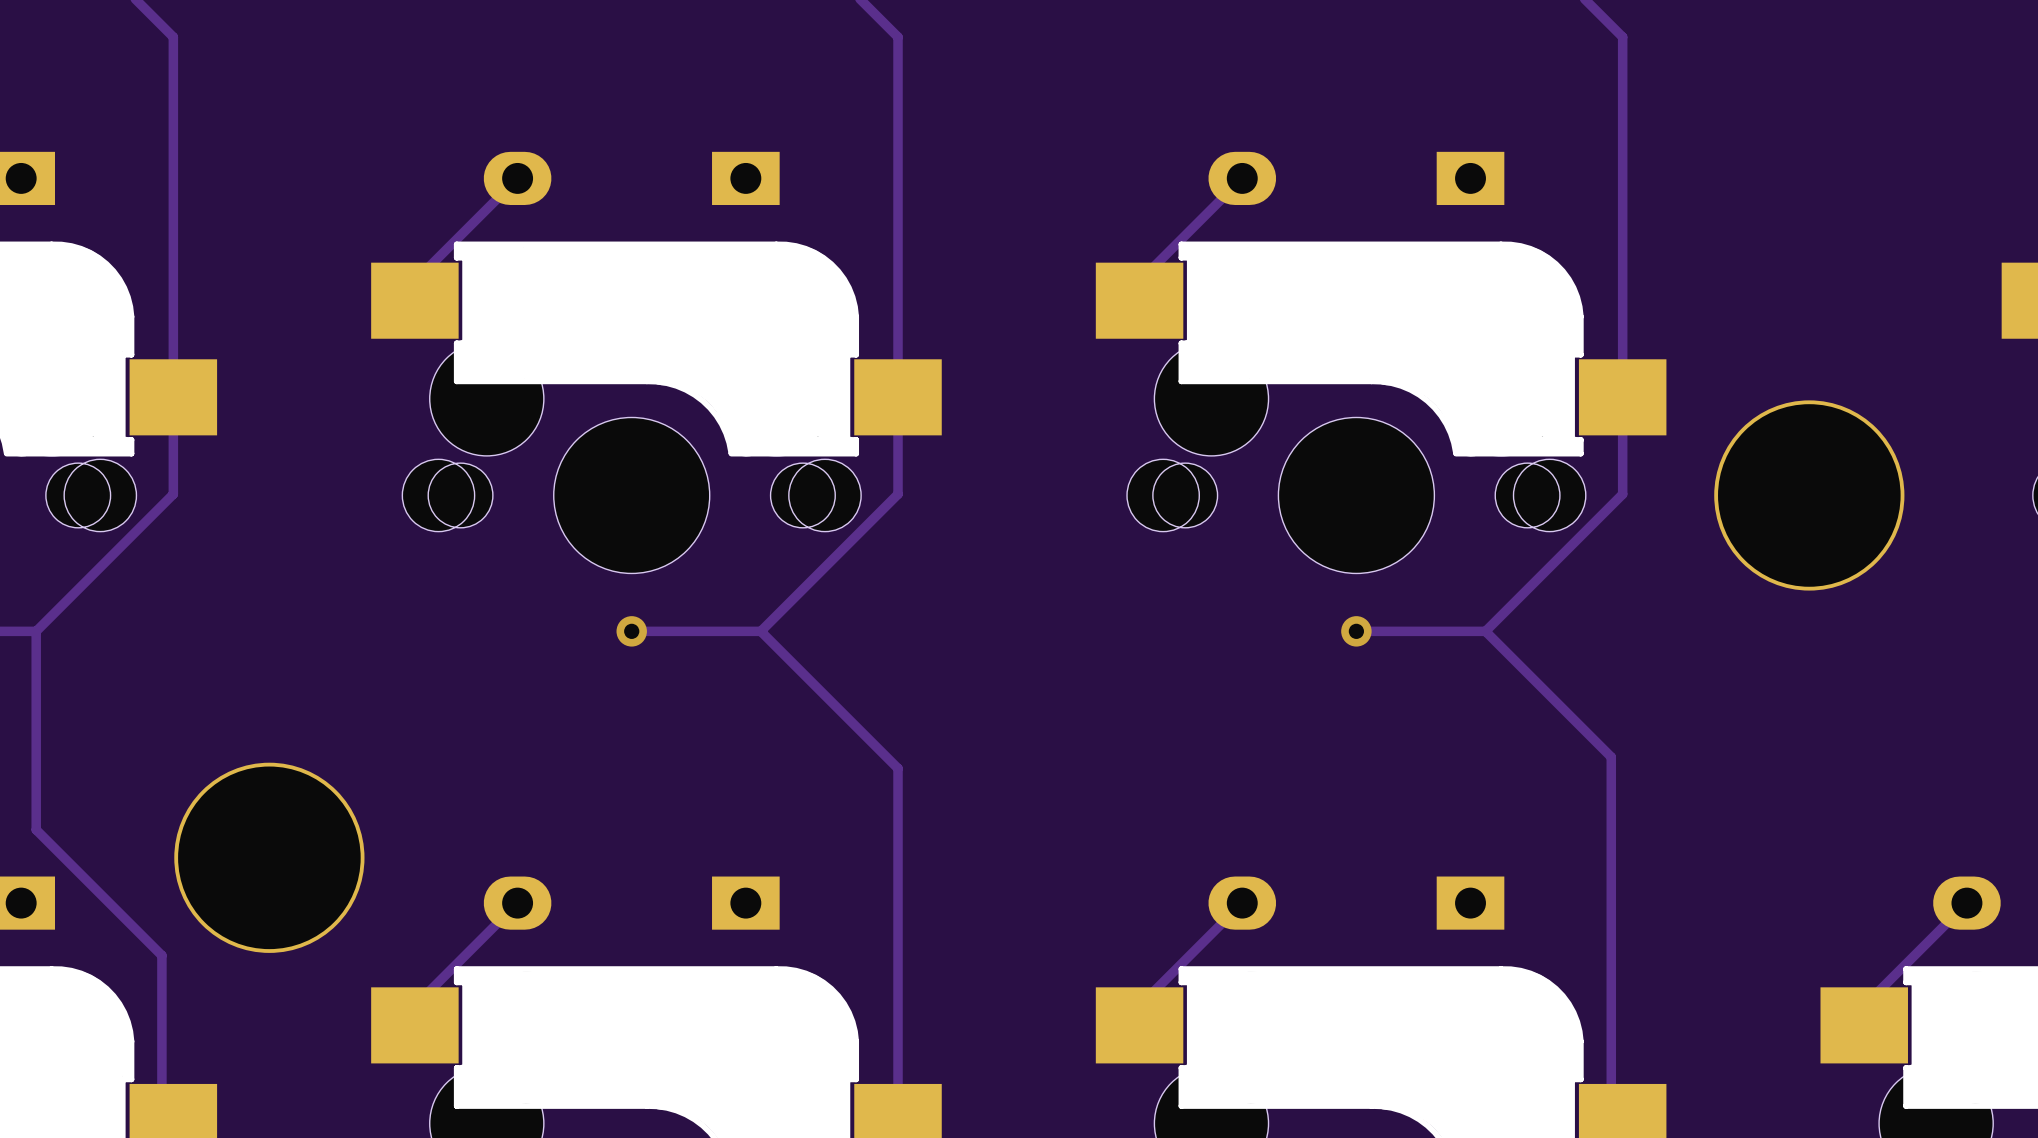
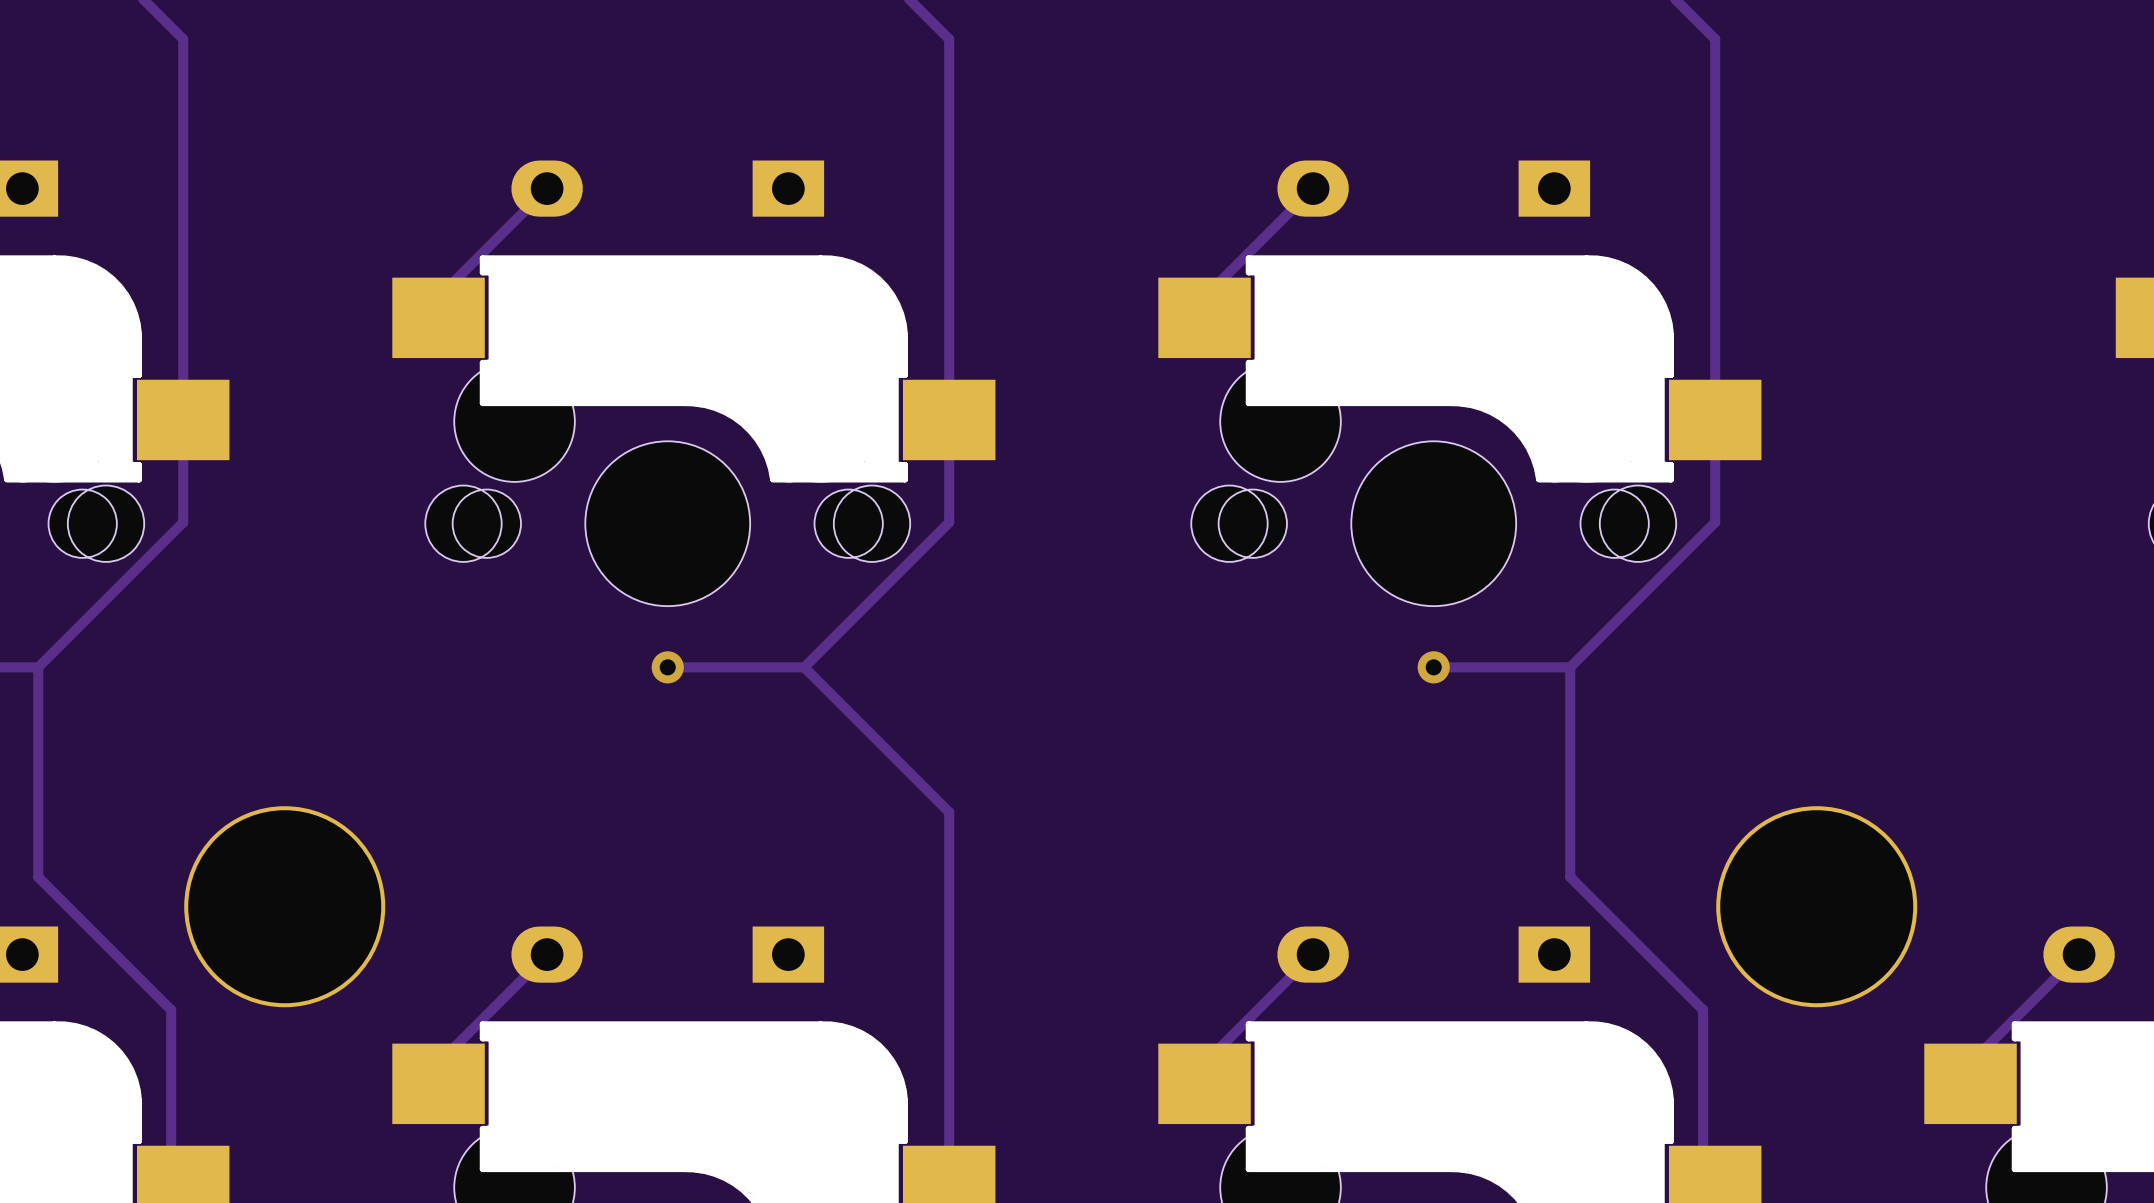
part position: (1809, 495) -> (1816, 906)
track: (1485, 631) (1611, 757) (1611, 955) -> (1570, 667) (1570, 877) (1703, 1010)

